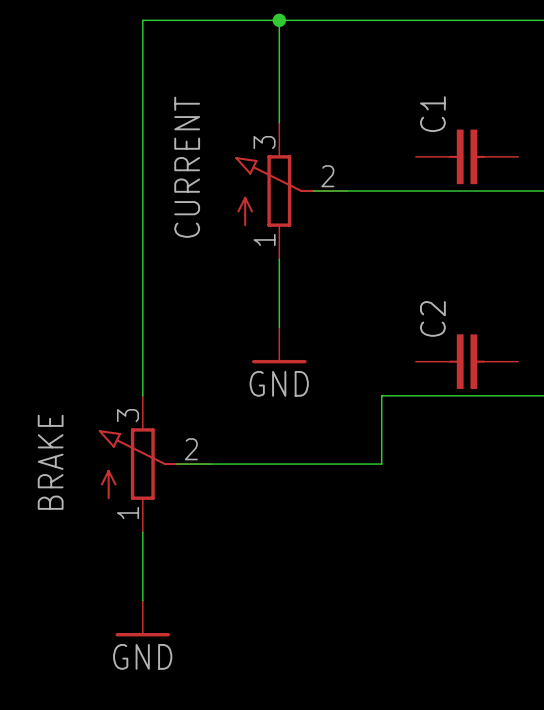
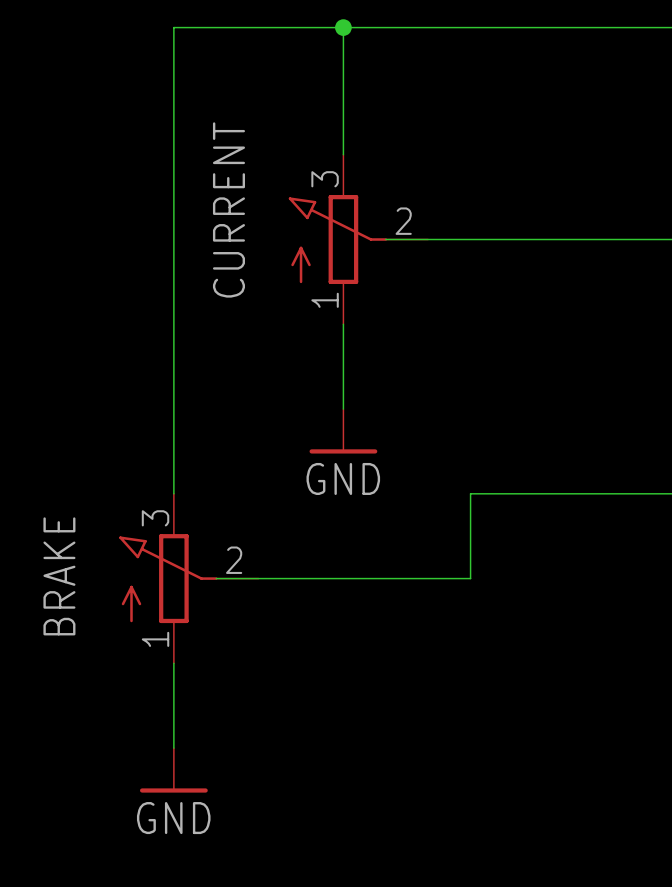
C1: (467, 156) -> none
C2: (467, 361) -> none

